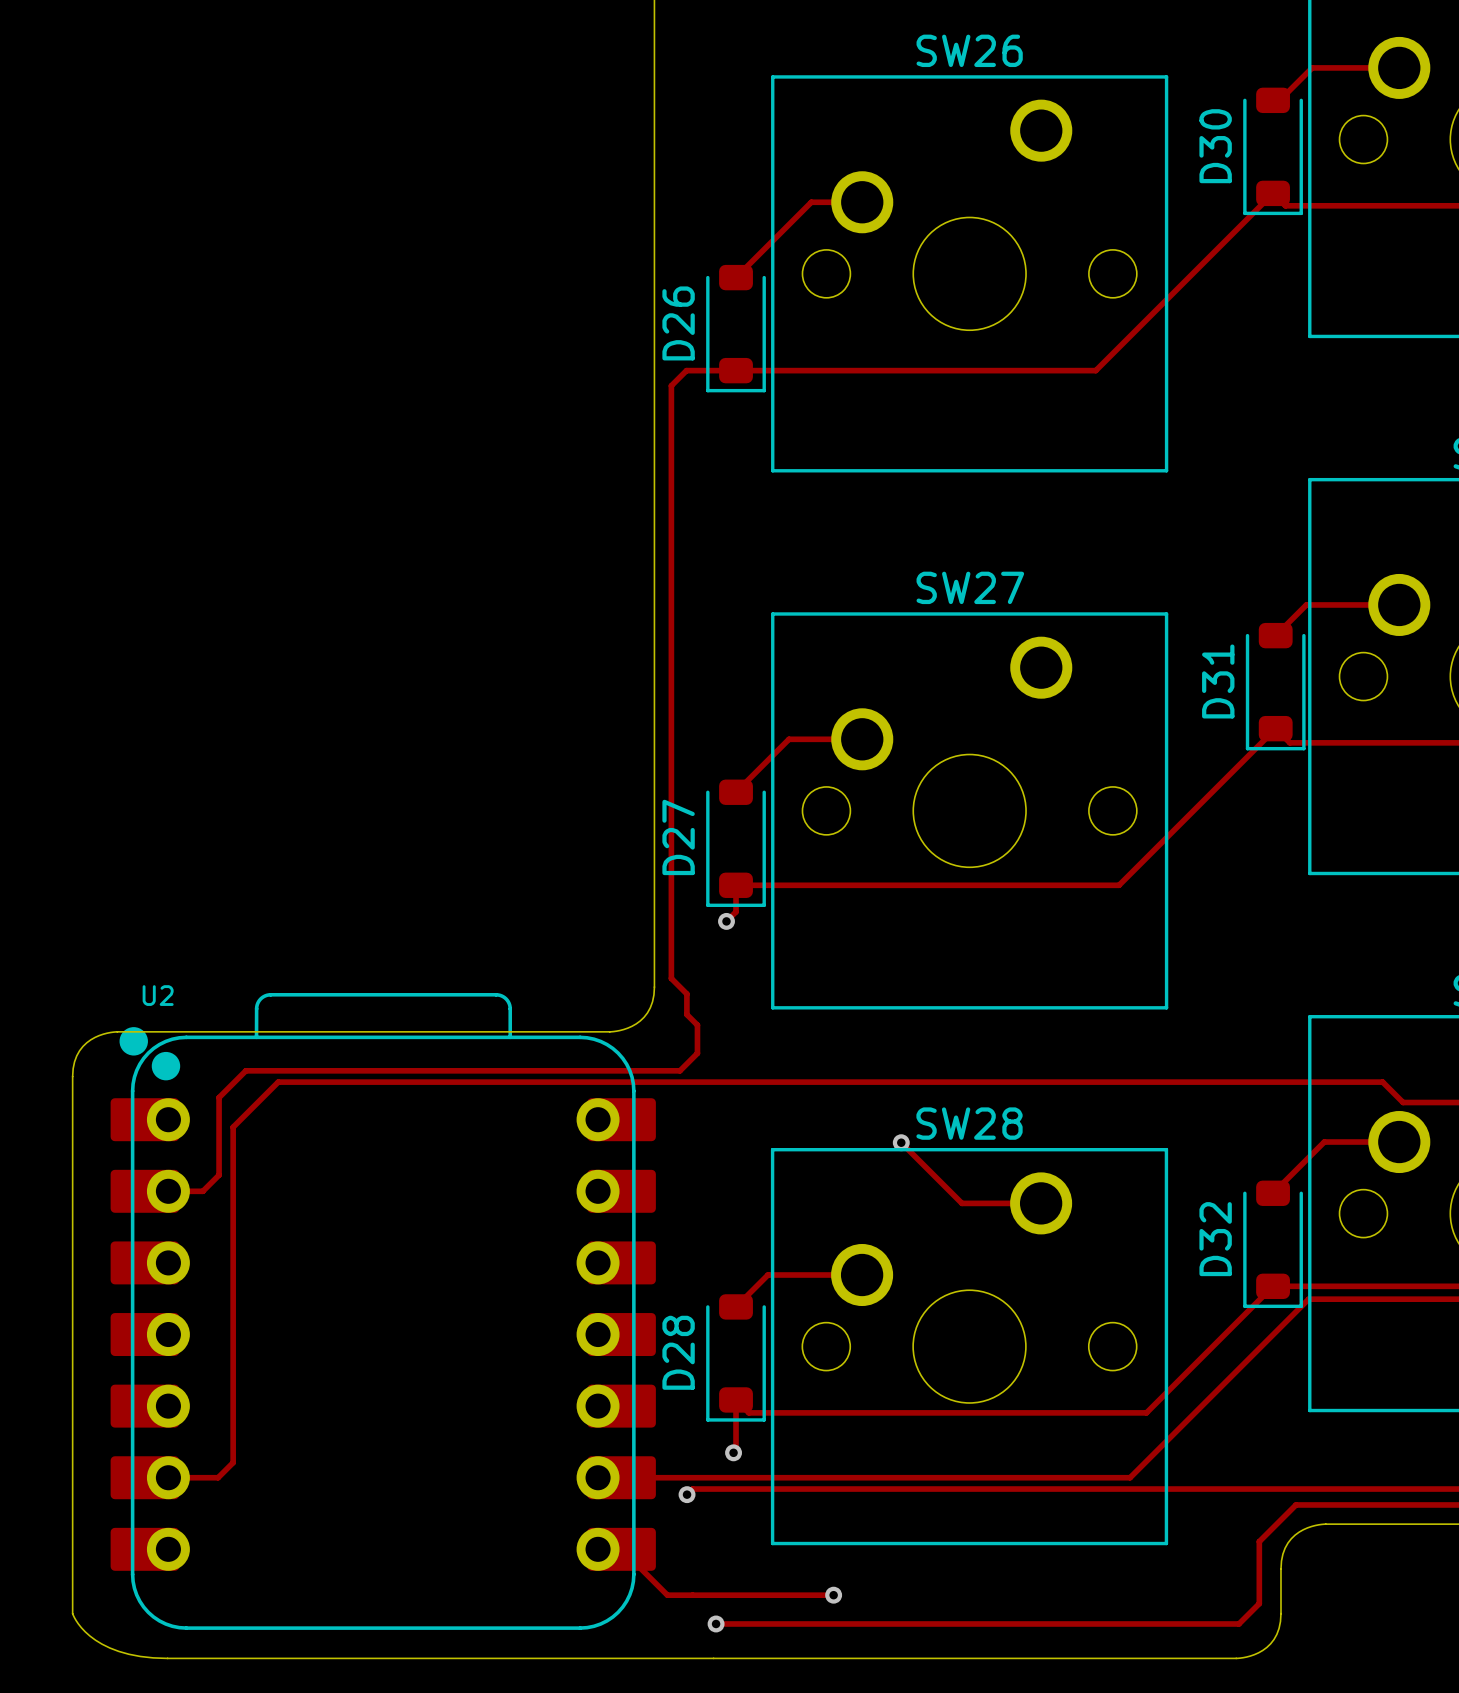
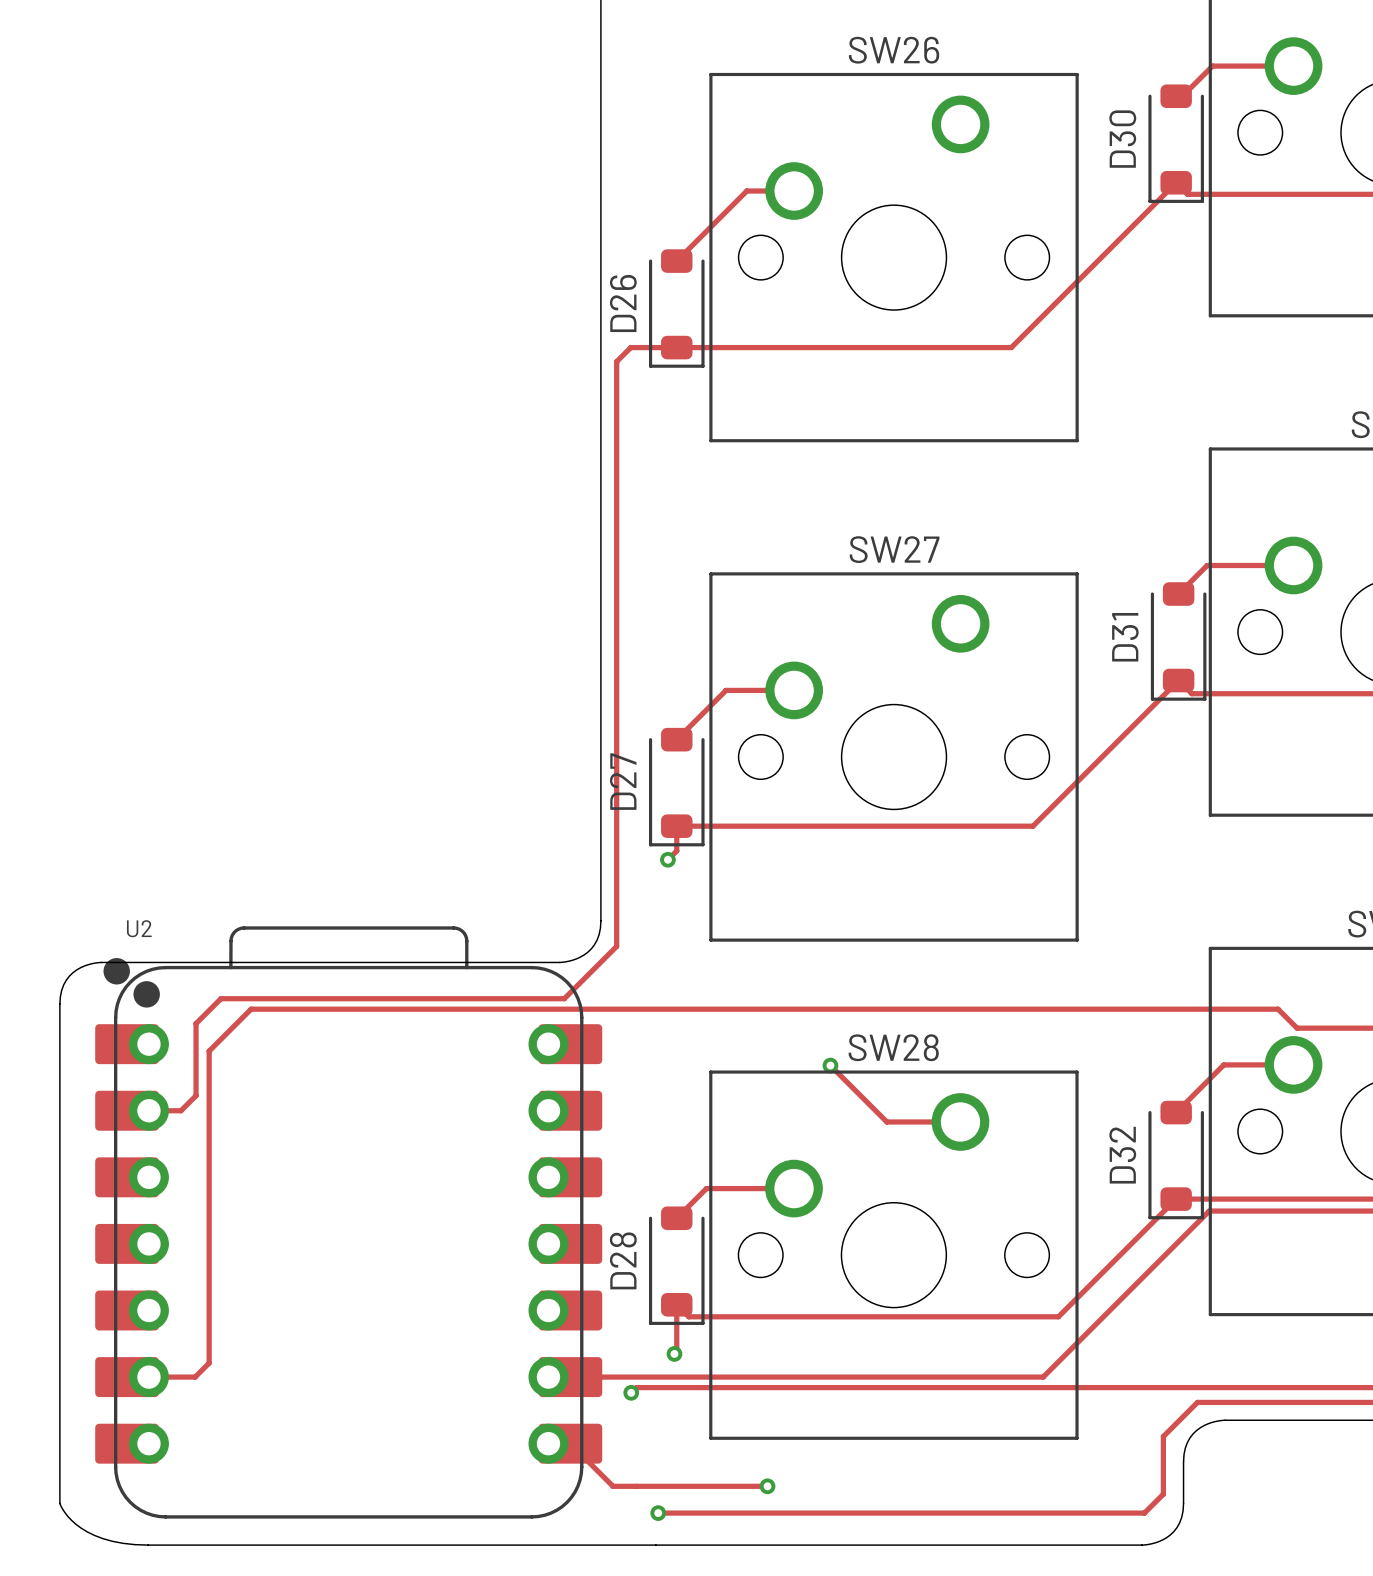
track: (671, 978) (686, 994) (686, 1014) (697, 1025) (697, 1053) (679, 1070) (615, 1070) -> (616, 912) (616, 946) (564, 998)

